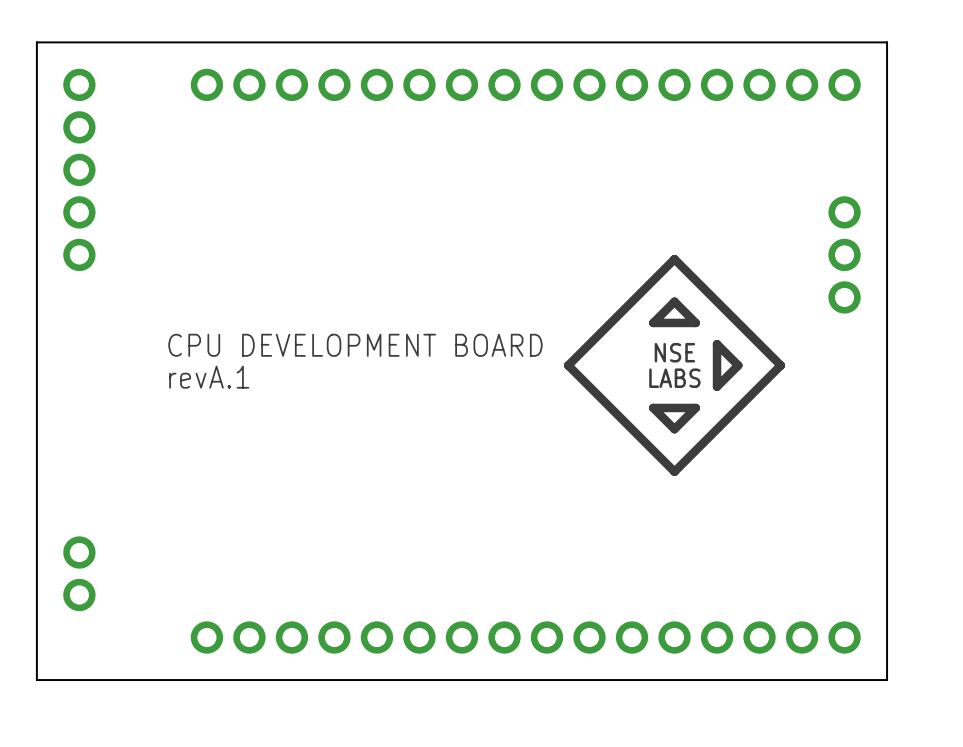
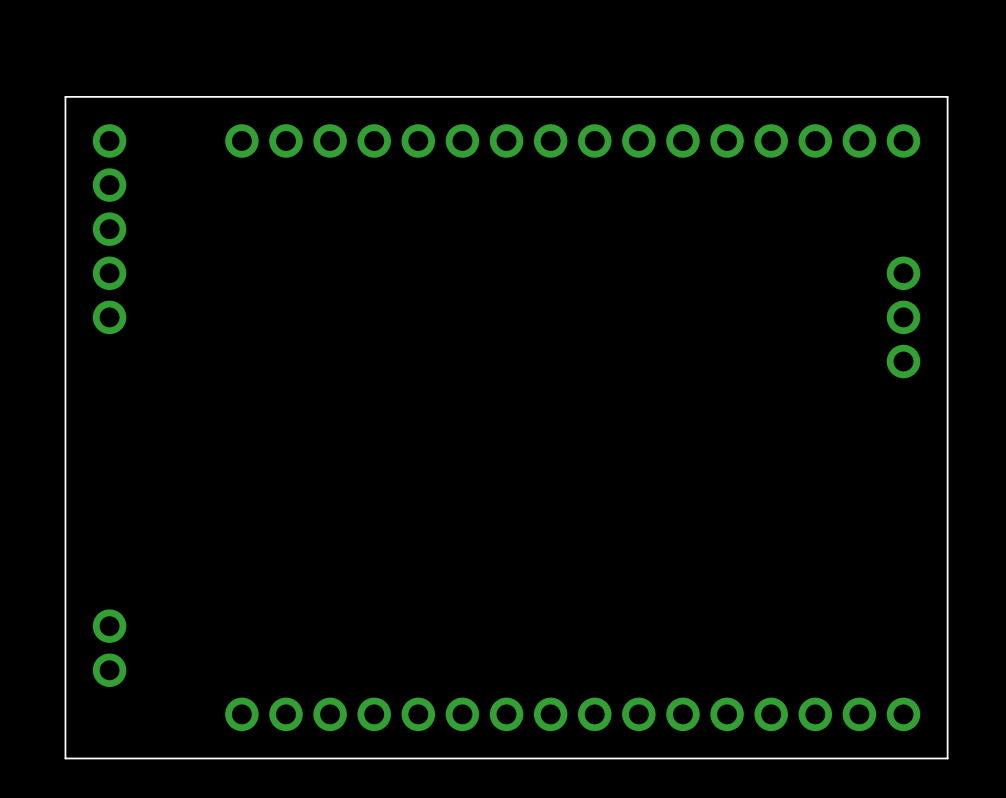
line: (674, 259) (568, 365) (674, 471) (780, 365) (674, 259) -> none
line: (674, 301) (653, 322) (695, 322) (674, 301) -> none
line: (717, 344) (738, 365) (717, 386) (717, 344) -> none
text: CPU DEVELOPMENT BOARD (355, 345) -> none
text: NSE (674, 352) -> none
text: revA.1 (209, 377) -> none
text: LABS (674, 378) -> none
line: (695, 407) (674, 429) (653, 407) (695, 407) -> none

